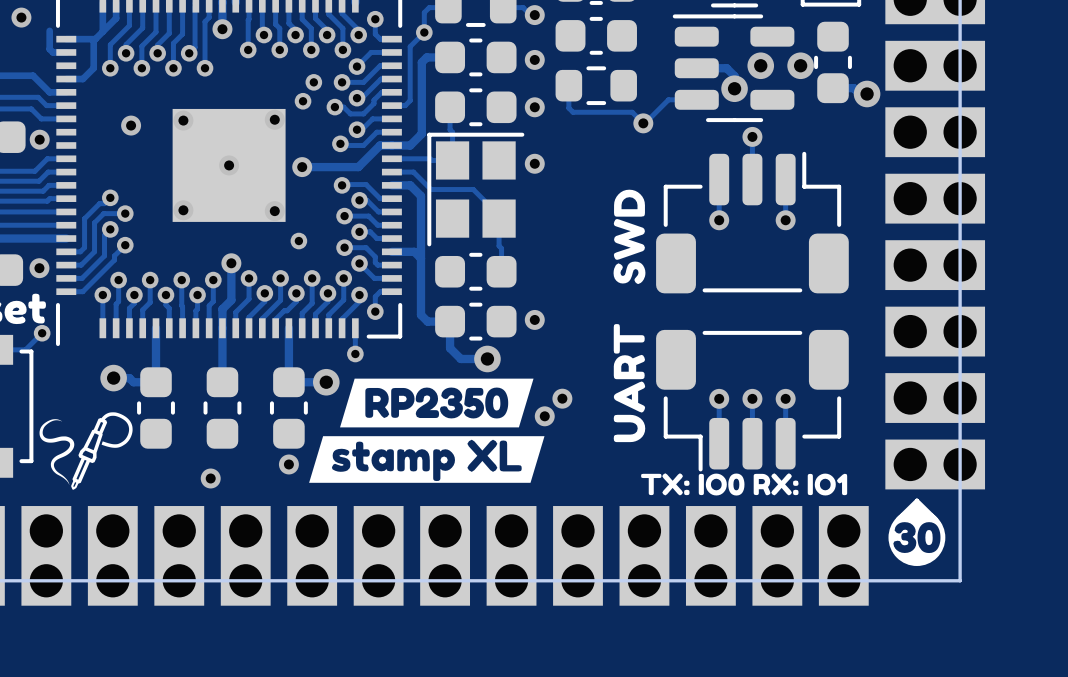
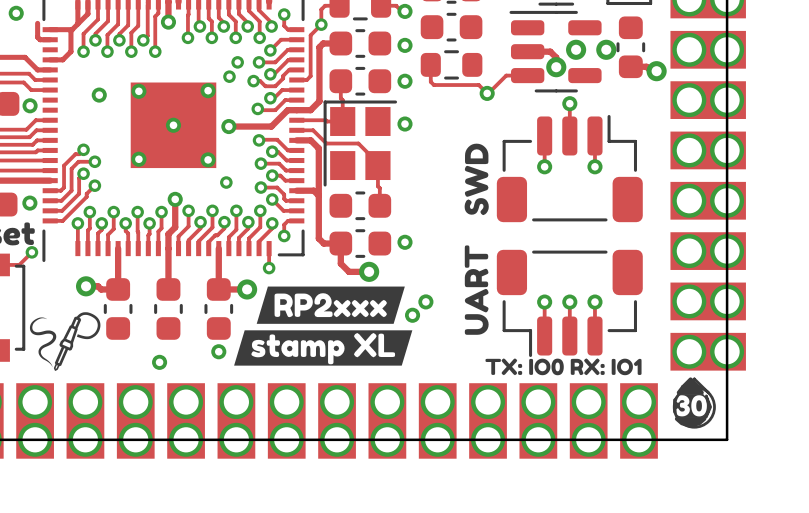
drawing shape: [340, 378, 534, 428] -> [256, 286, 405, 324]
drawing: none -> [676, 377, 712, 420]
drawing: [893, 500, 944, 554] -> none
drawing shape: [893, 522, 941, 554] -> [673, 394, 709, 418]
drawing shape: [893, 553, 941, 565] -> [674, 417, 707, 428]

